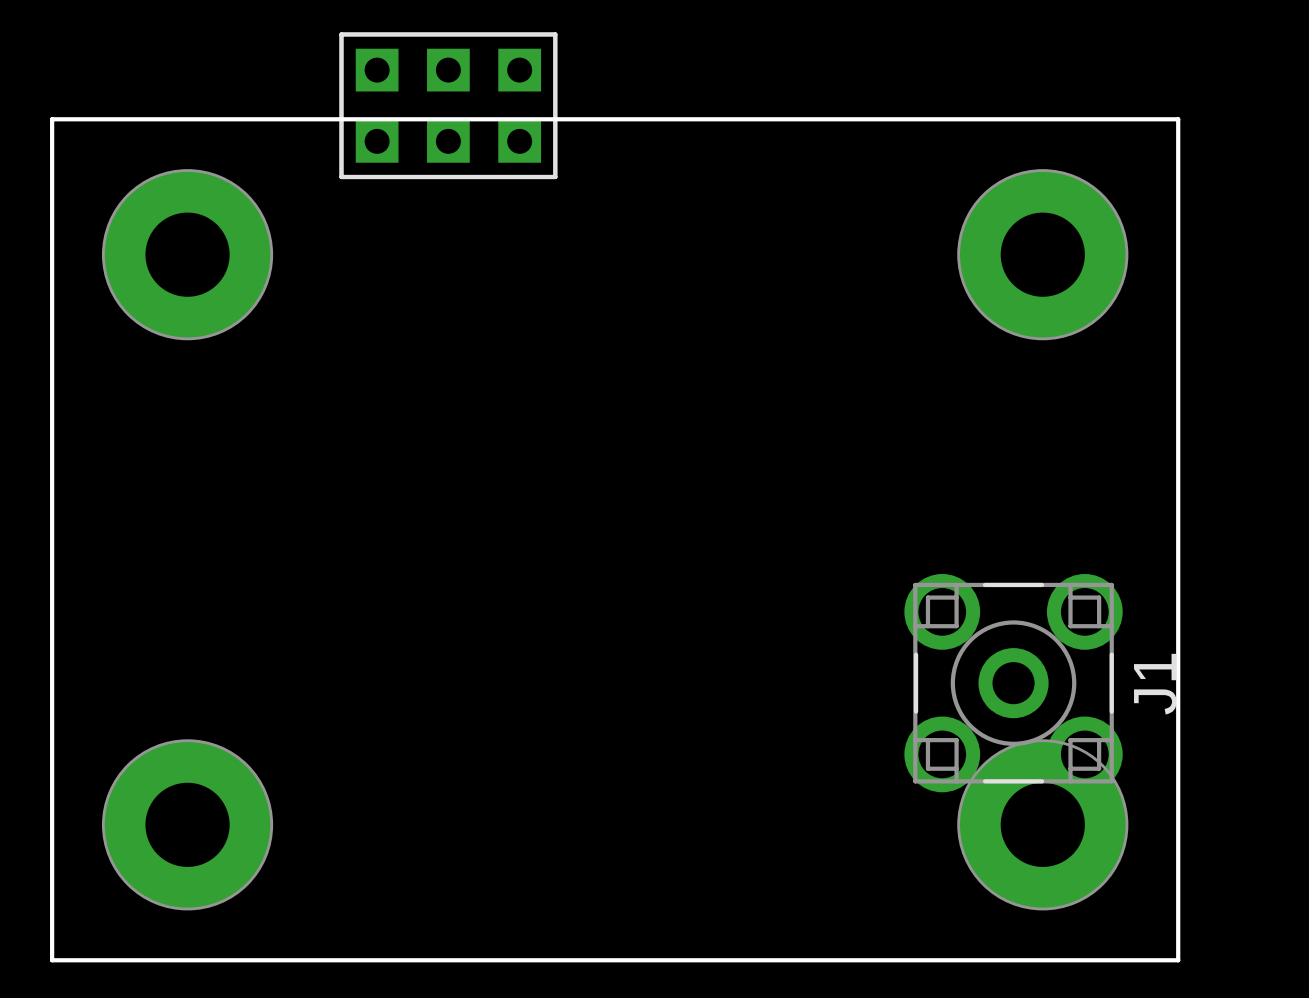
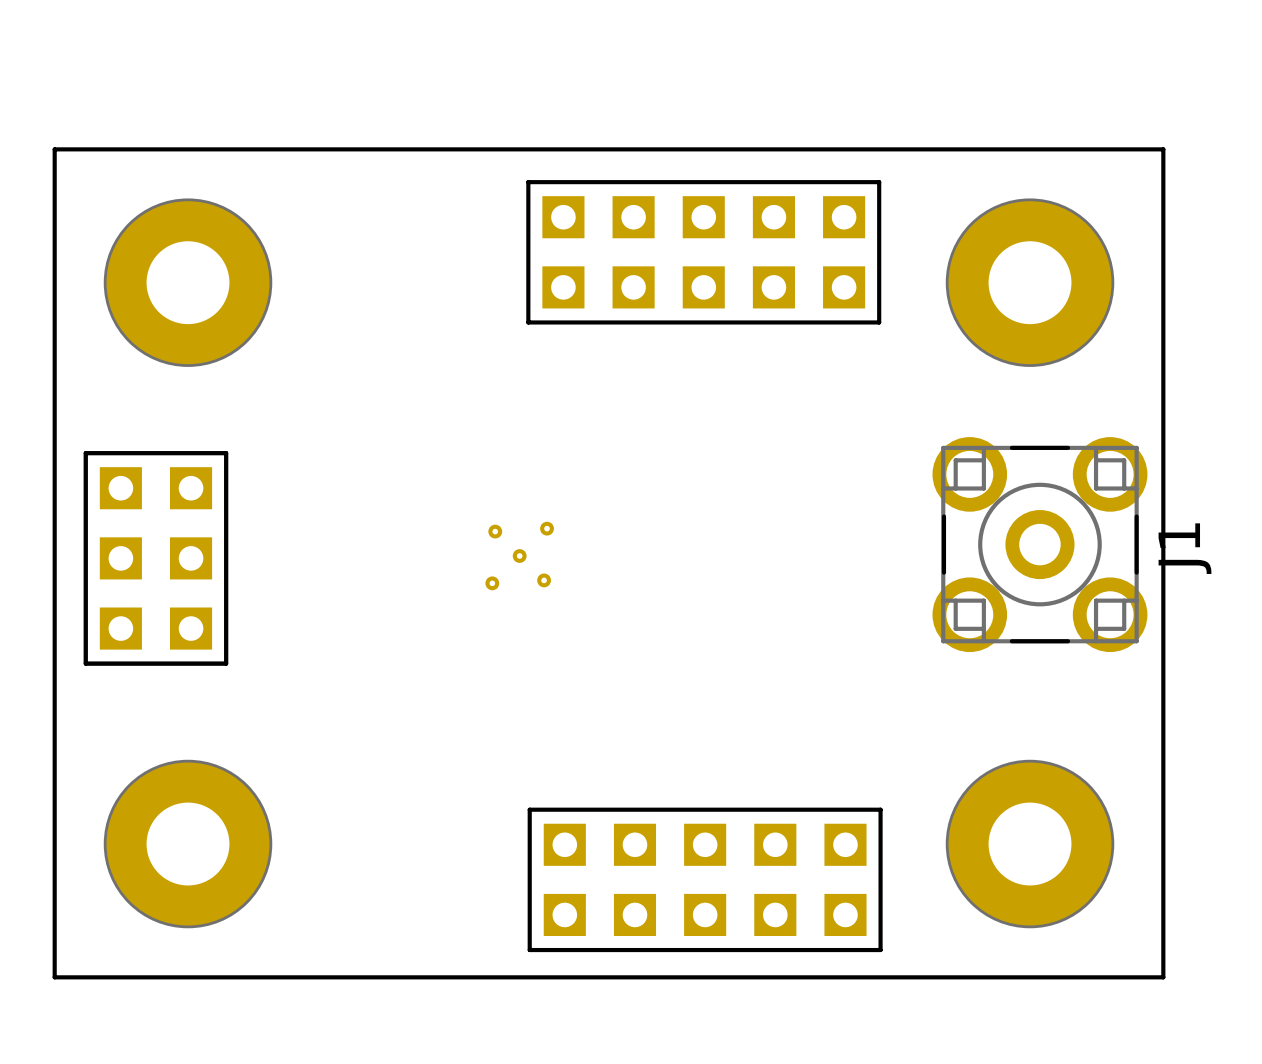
part rotation: 0° (448, 105) -> 90° clockwise (155, 558)
part position: (448, 105) -> (155, 558)
part: none -> (703, 252)
part: none -> (519, 556)
J1 position: (1013, 683) -> (1039, 544)
part: none -> (705, 879)

